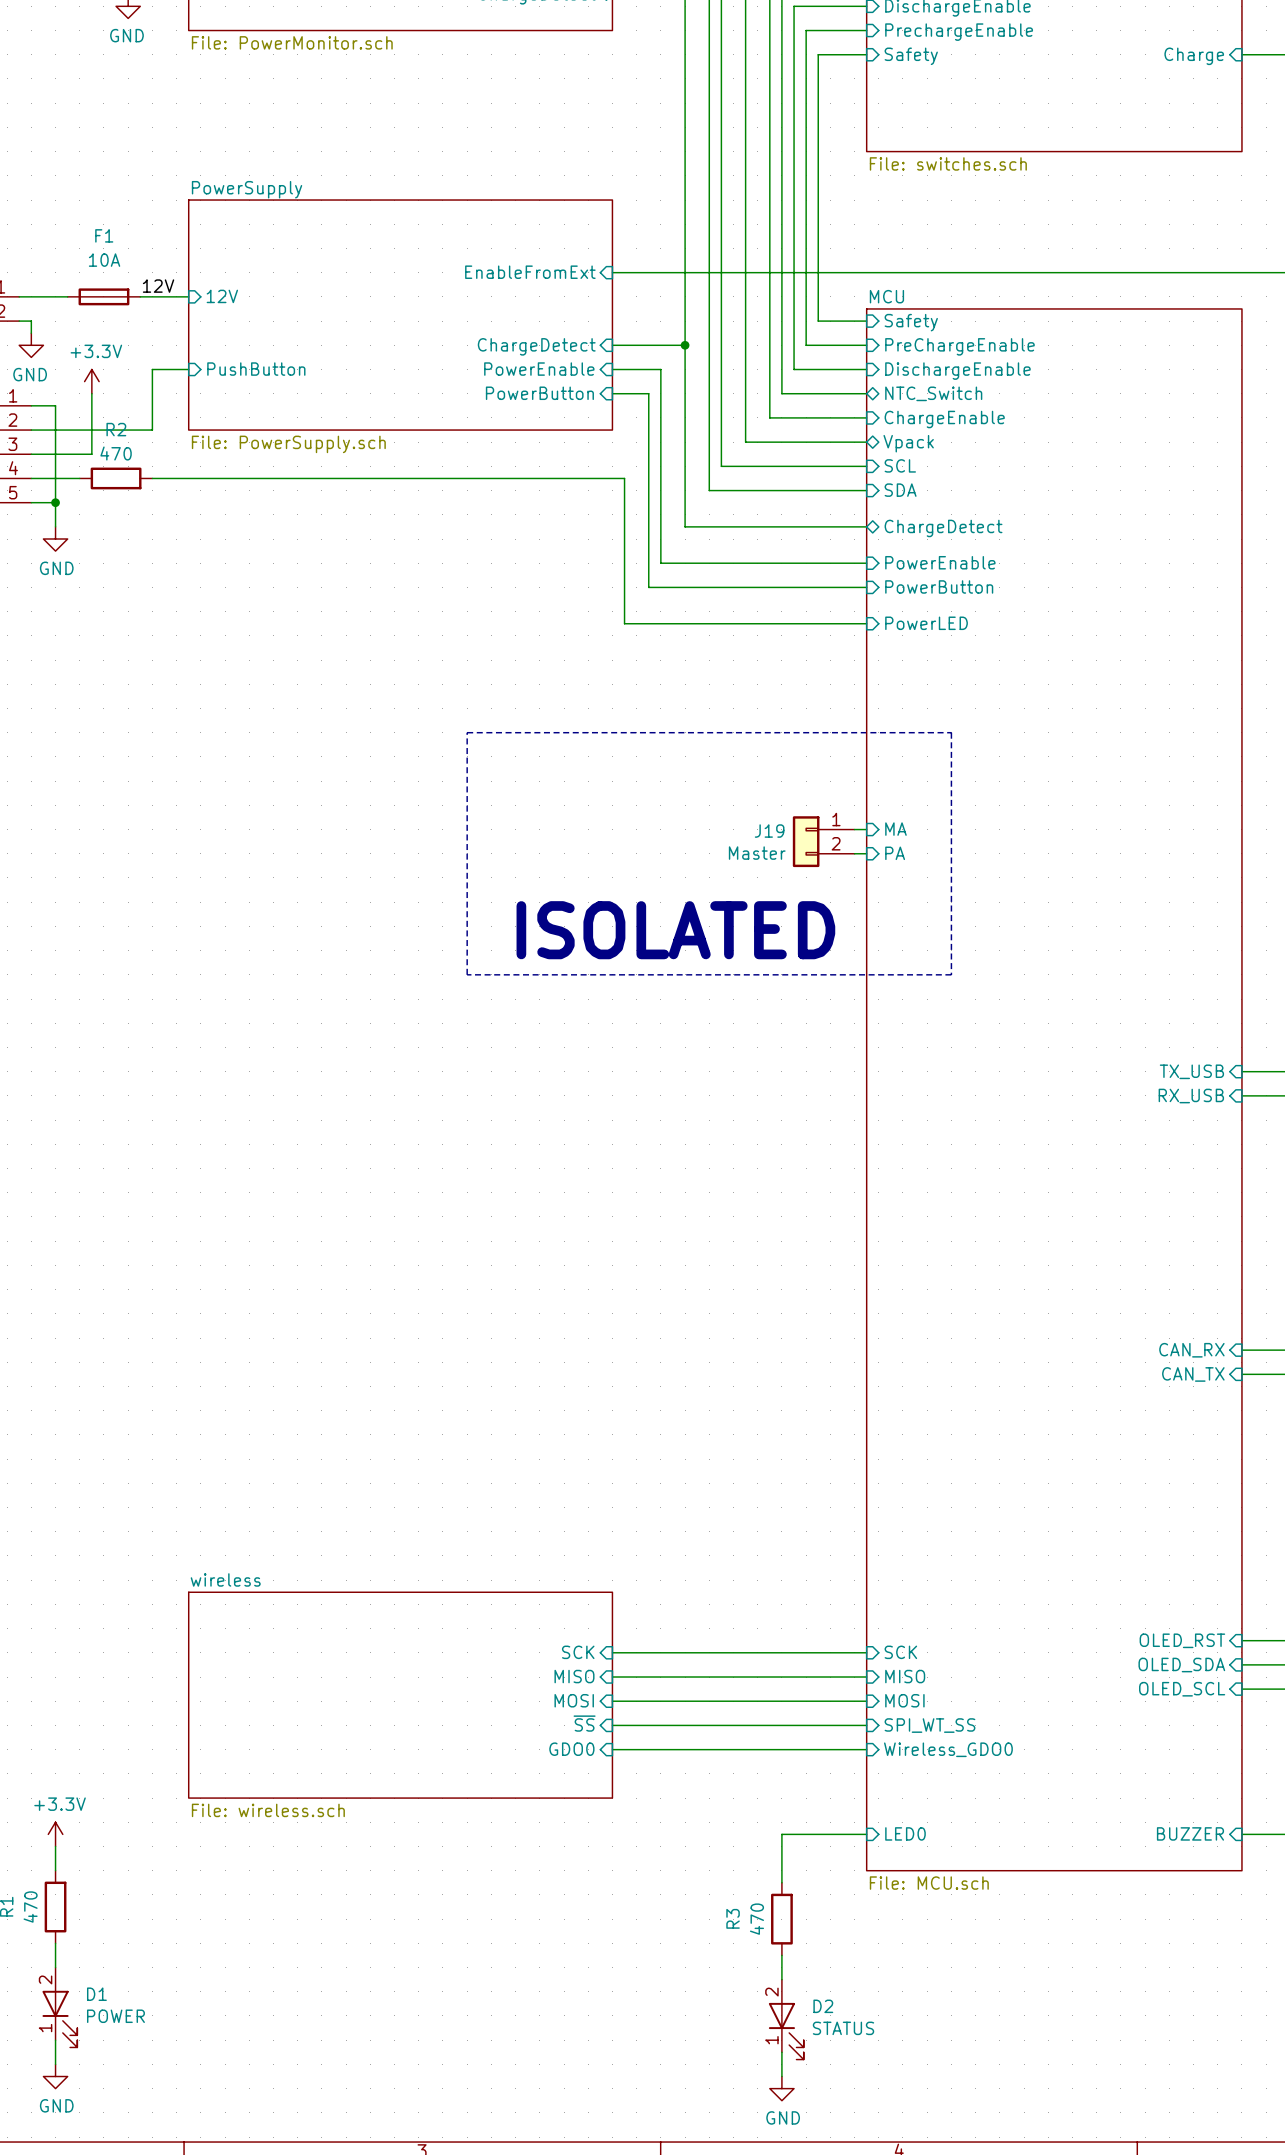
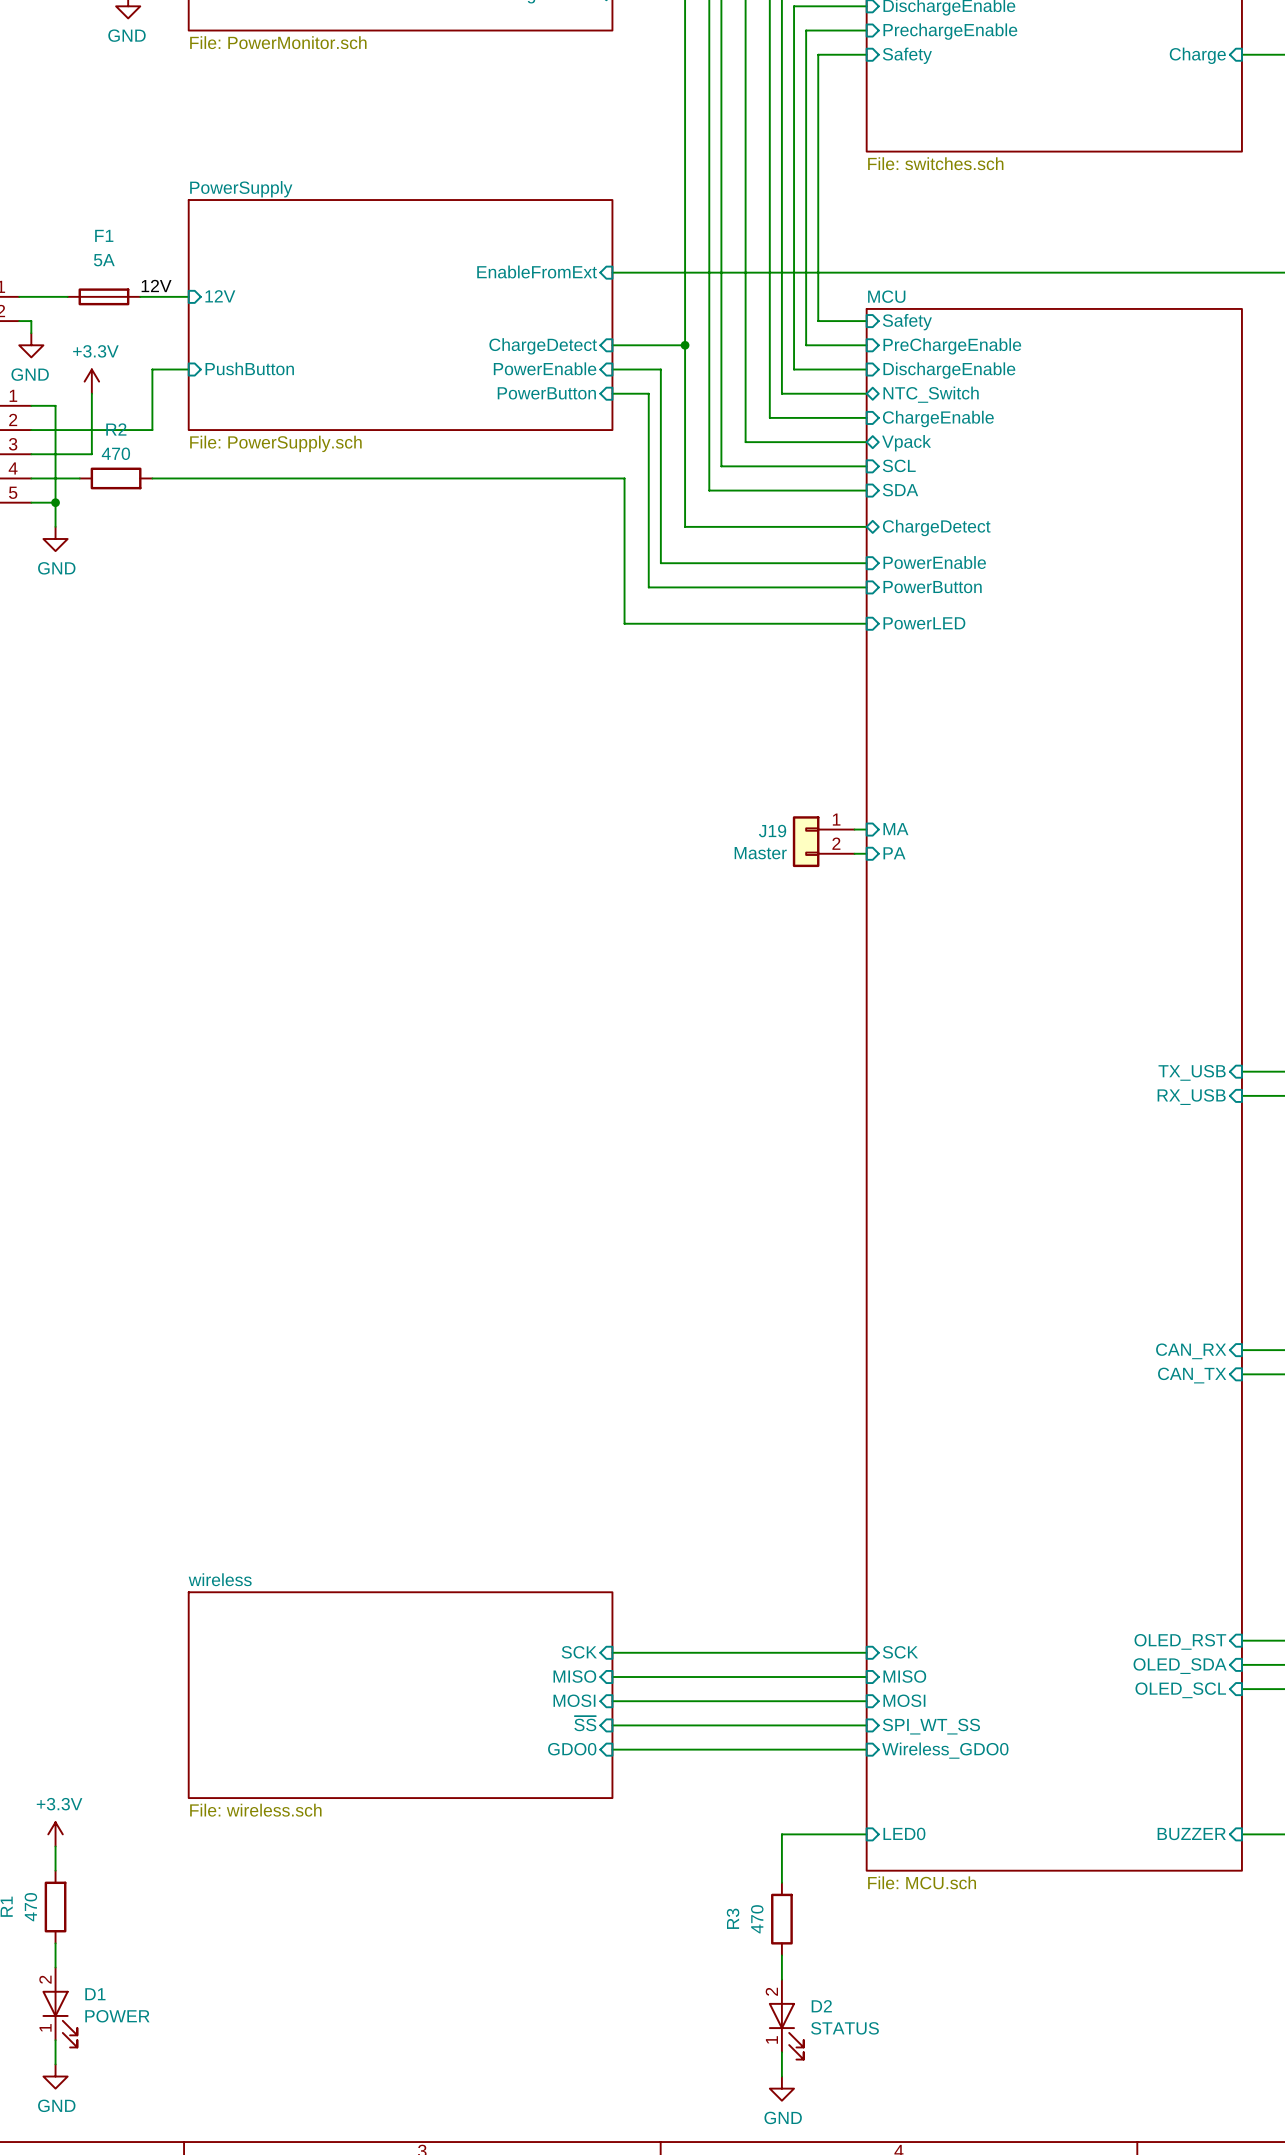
F1 value: 10A (104, 260) -> 5A (104, 260)
line: (467, 732) (951, 732) (951, 974) (467, 974) (467, 732) -> none
text: ISOLATED (675, 930) -> none

